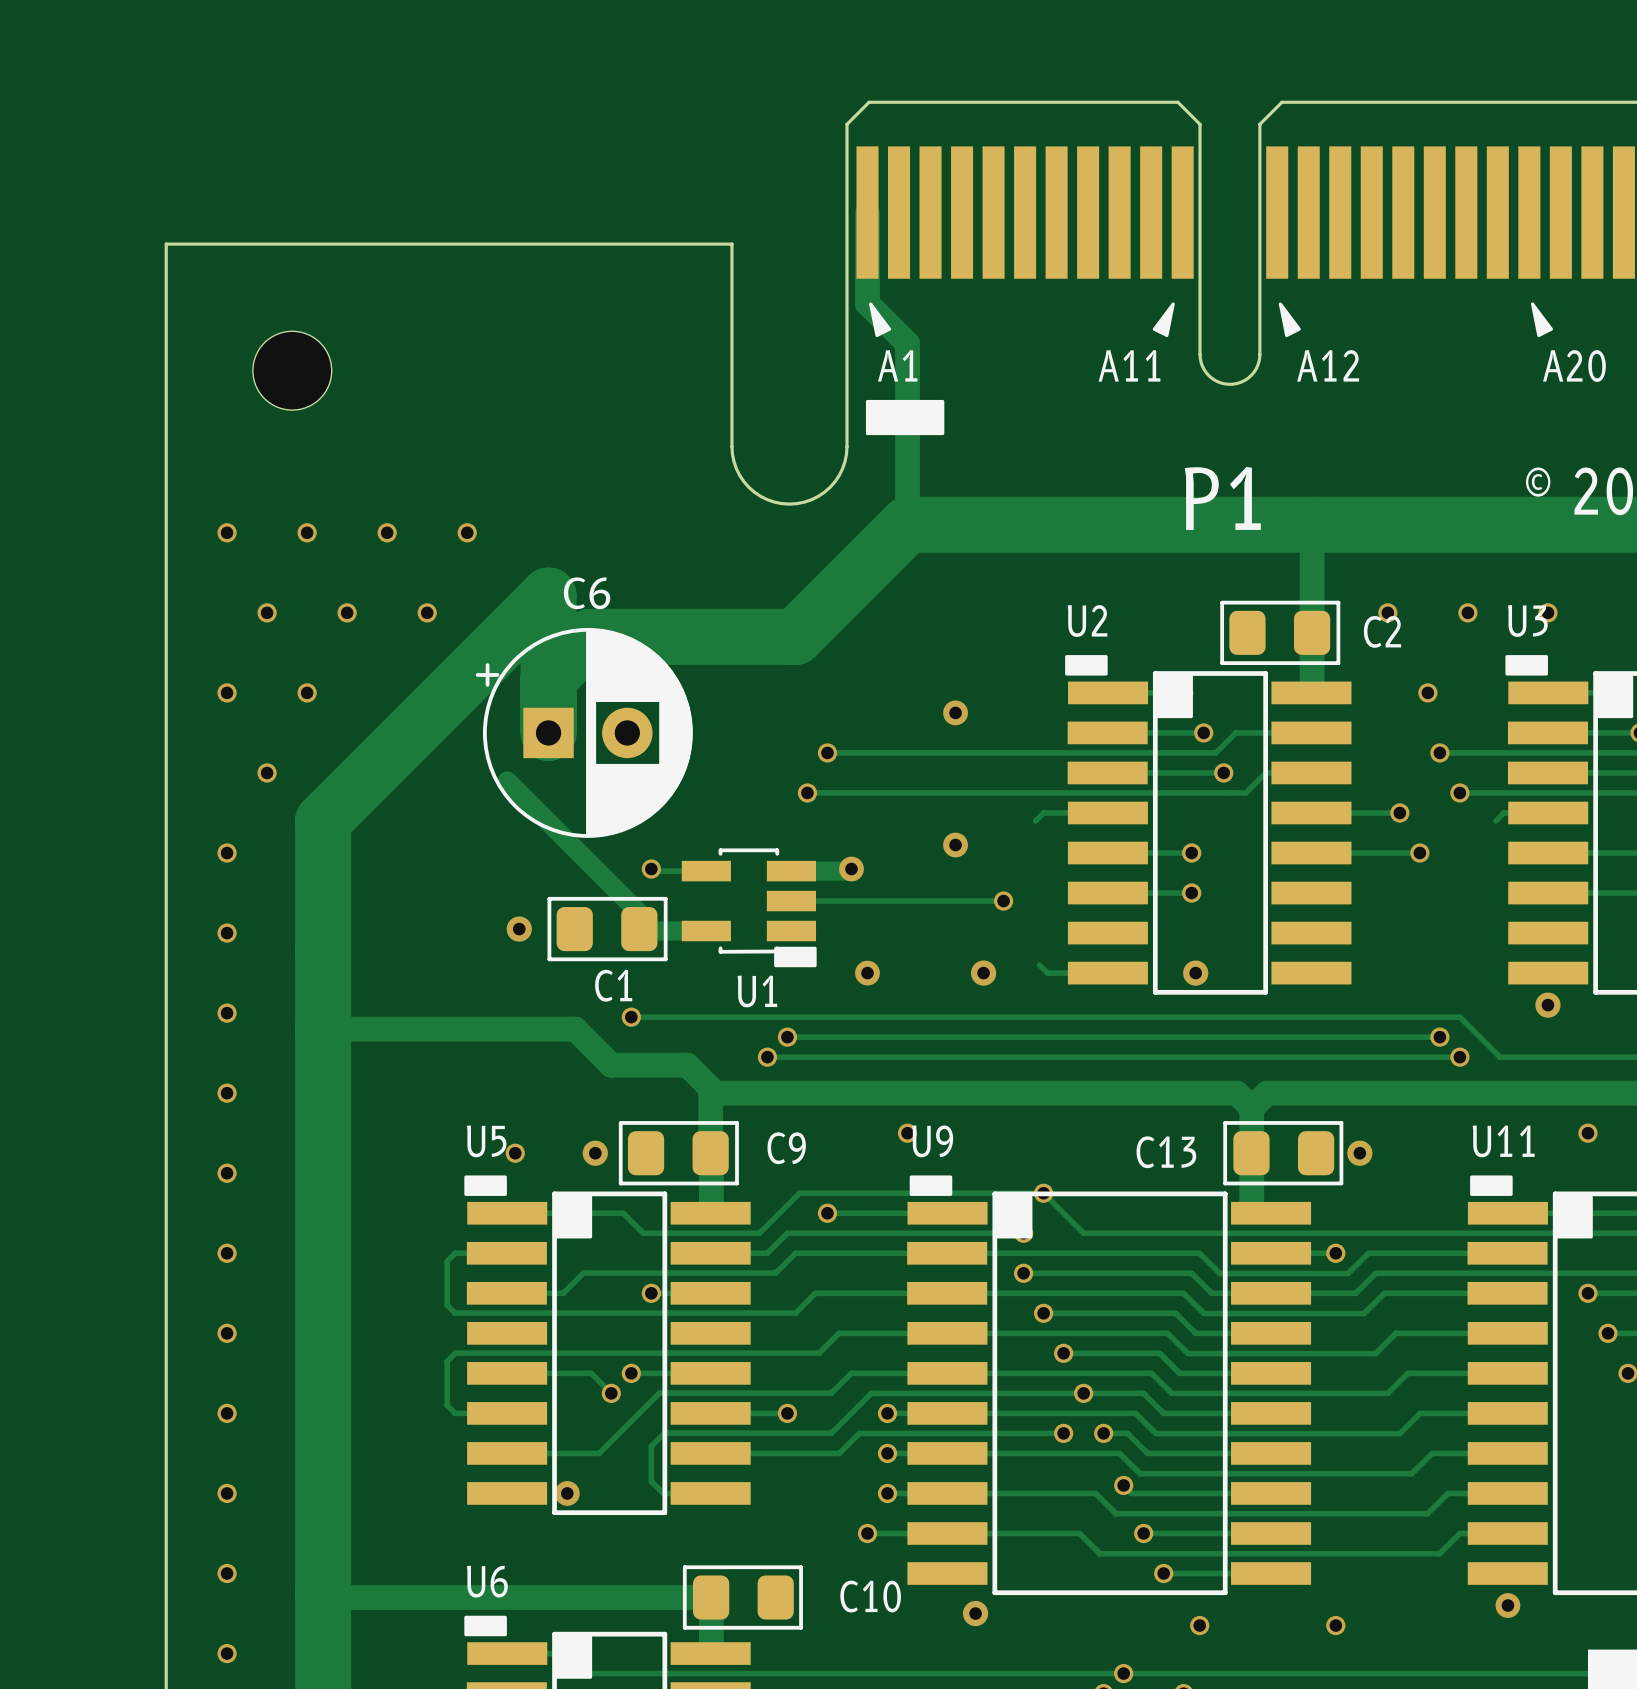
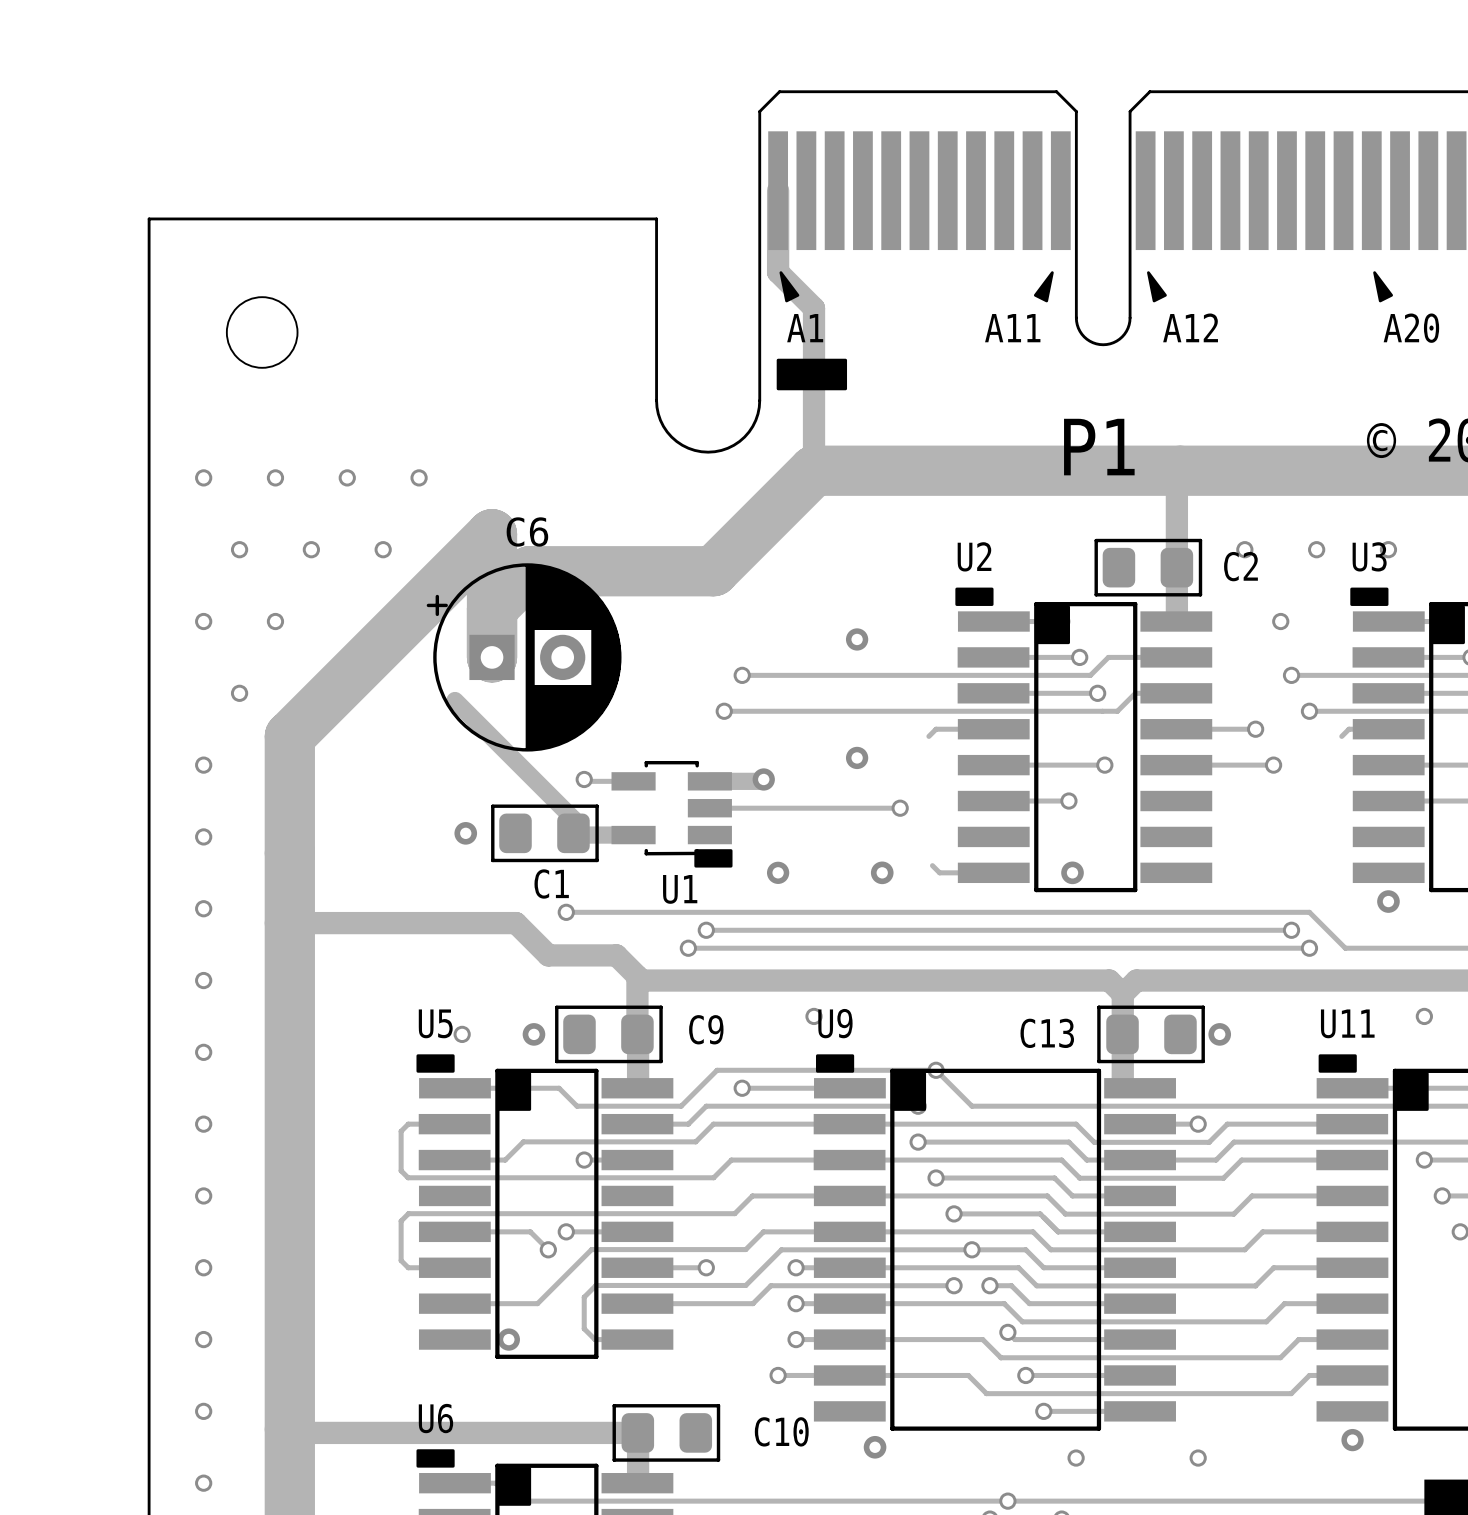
track: none -> (1068, 765) (1104, 765)
via position: (1191, 853) -> (1104, 765)

